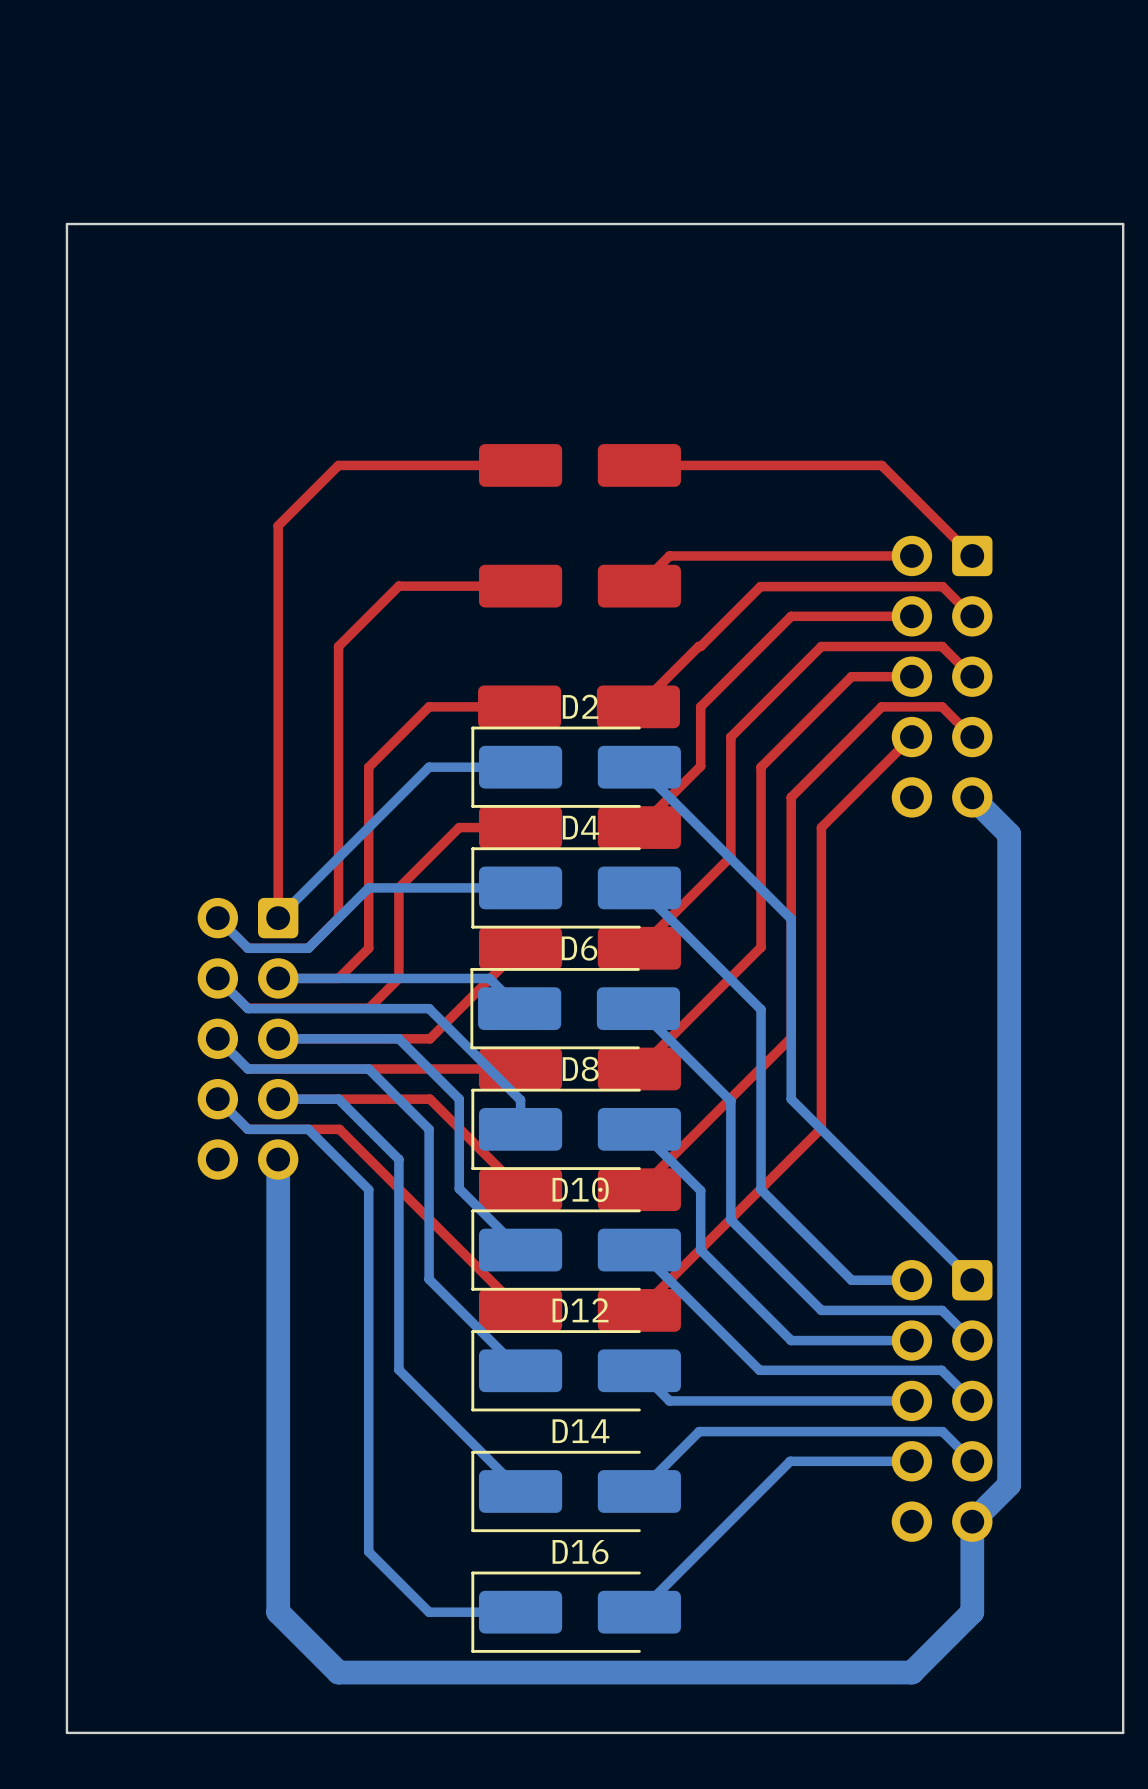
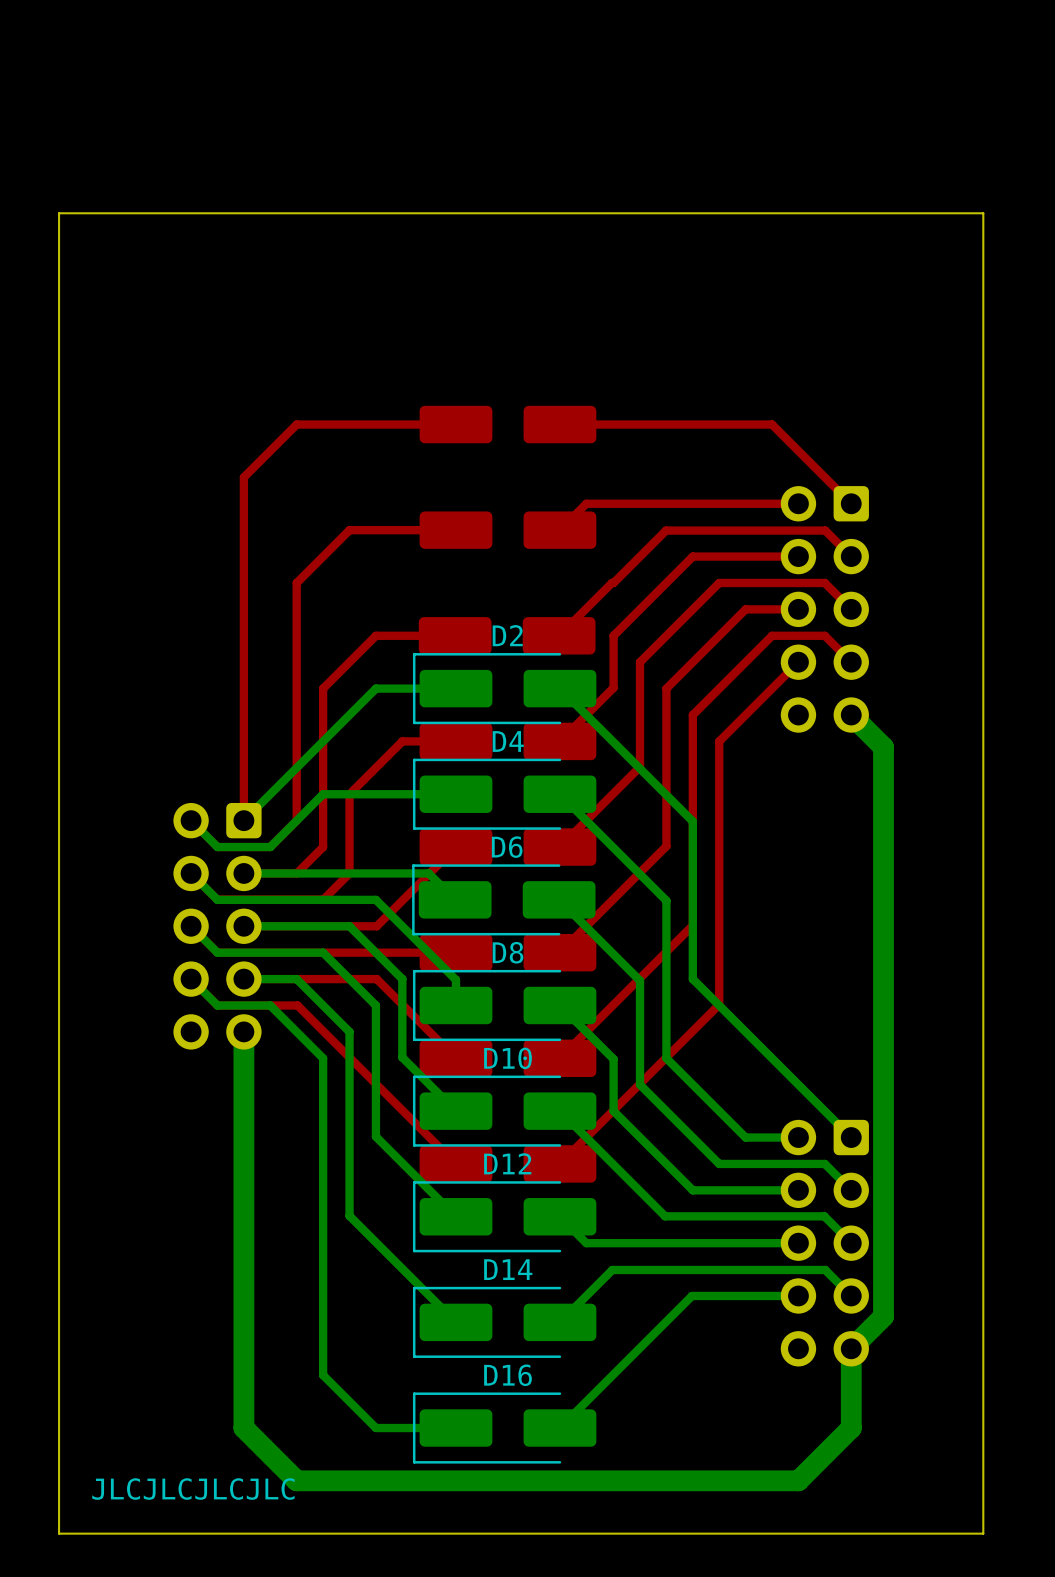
text: none -> JLCJLCJLCJLC (193, 1489)

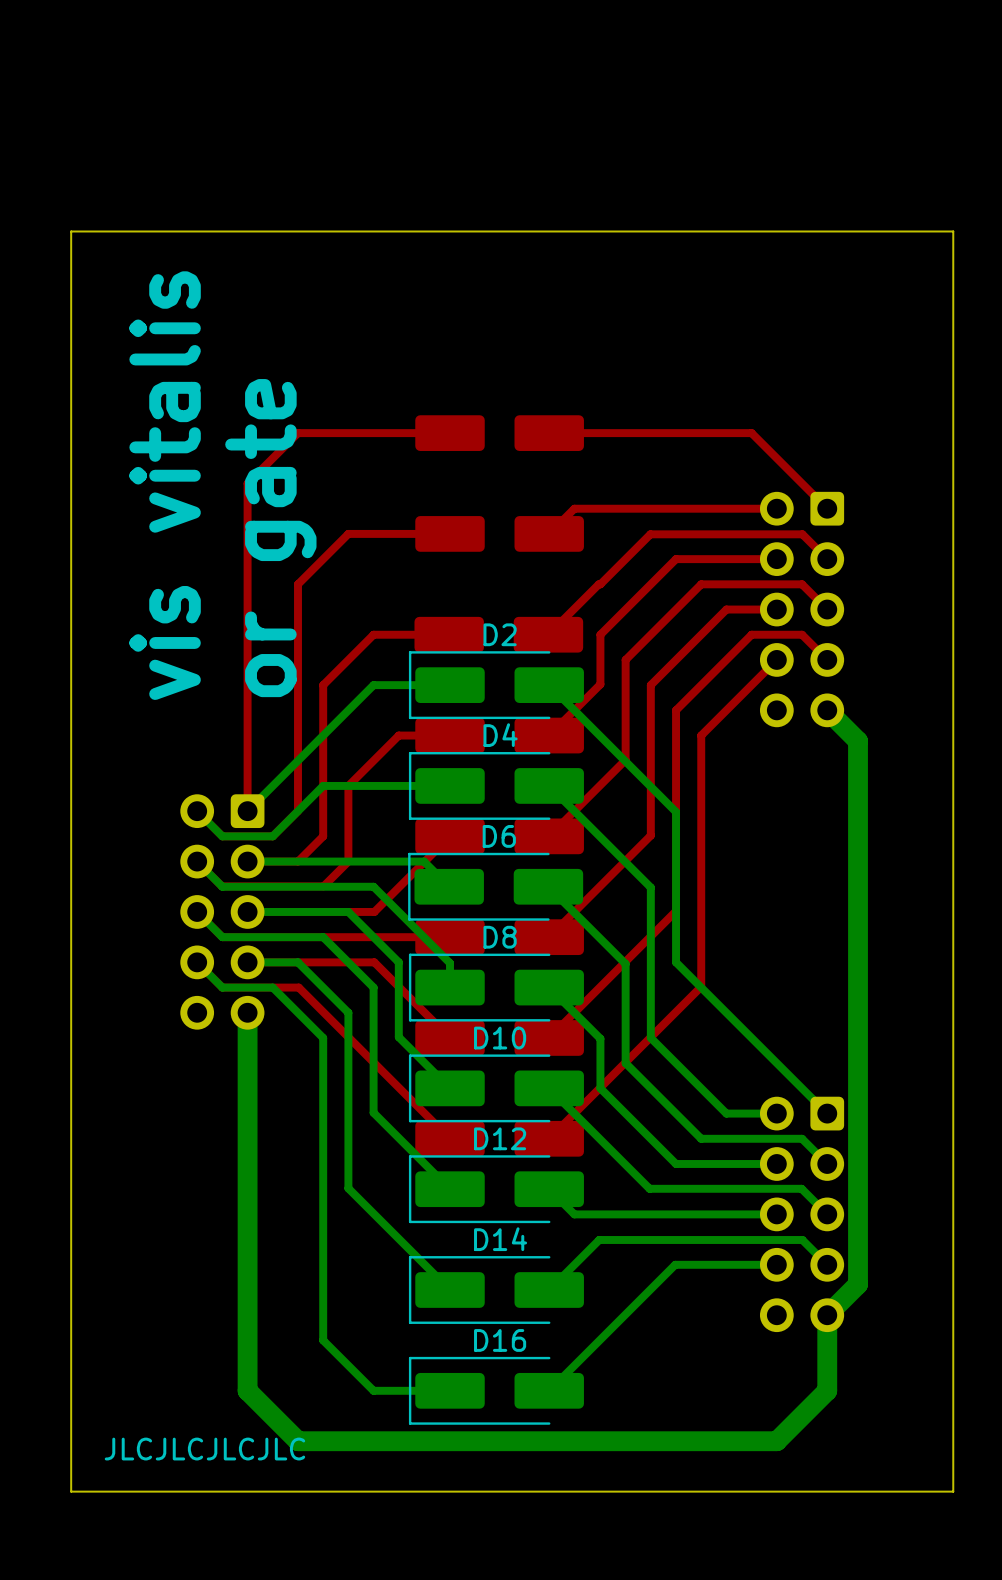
text: none -> vis vitalis (165, 485)
text: none -> or gate (270, 538)

